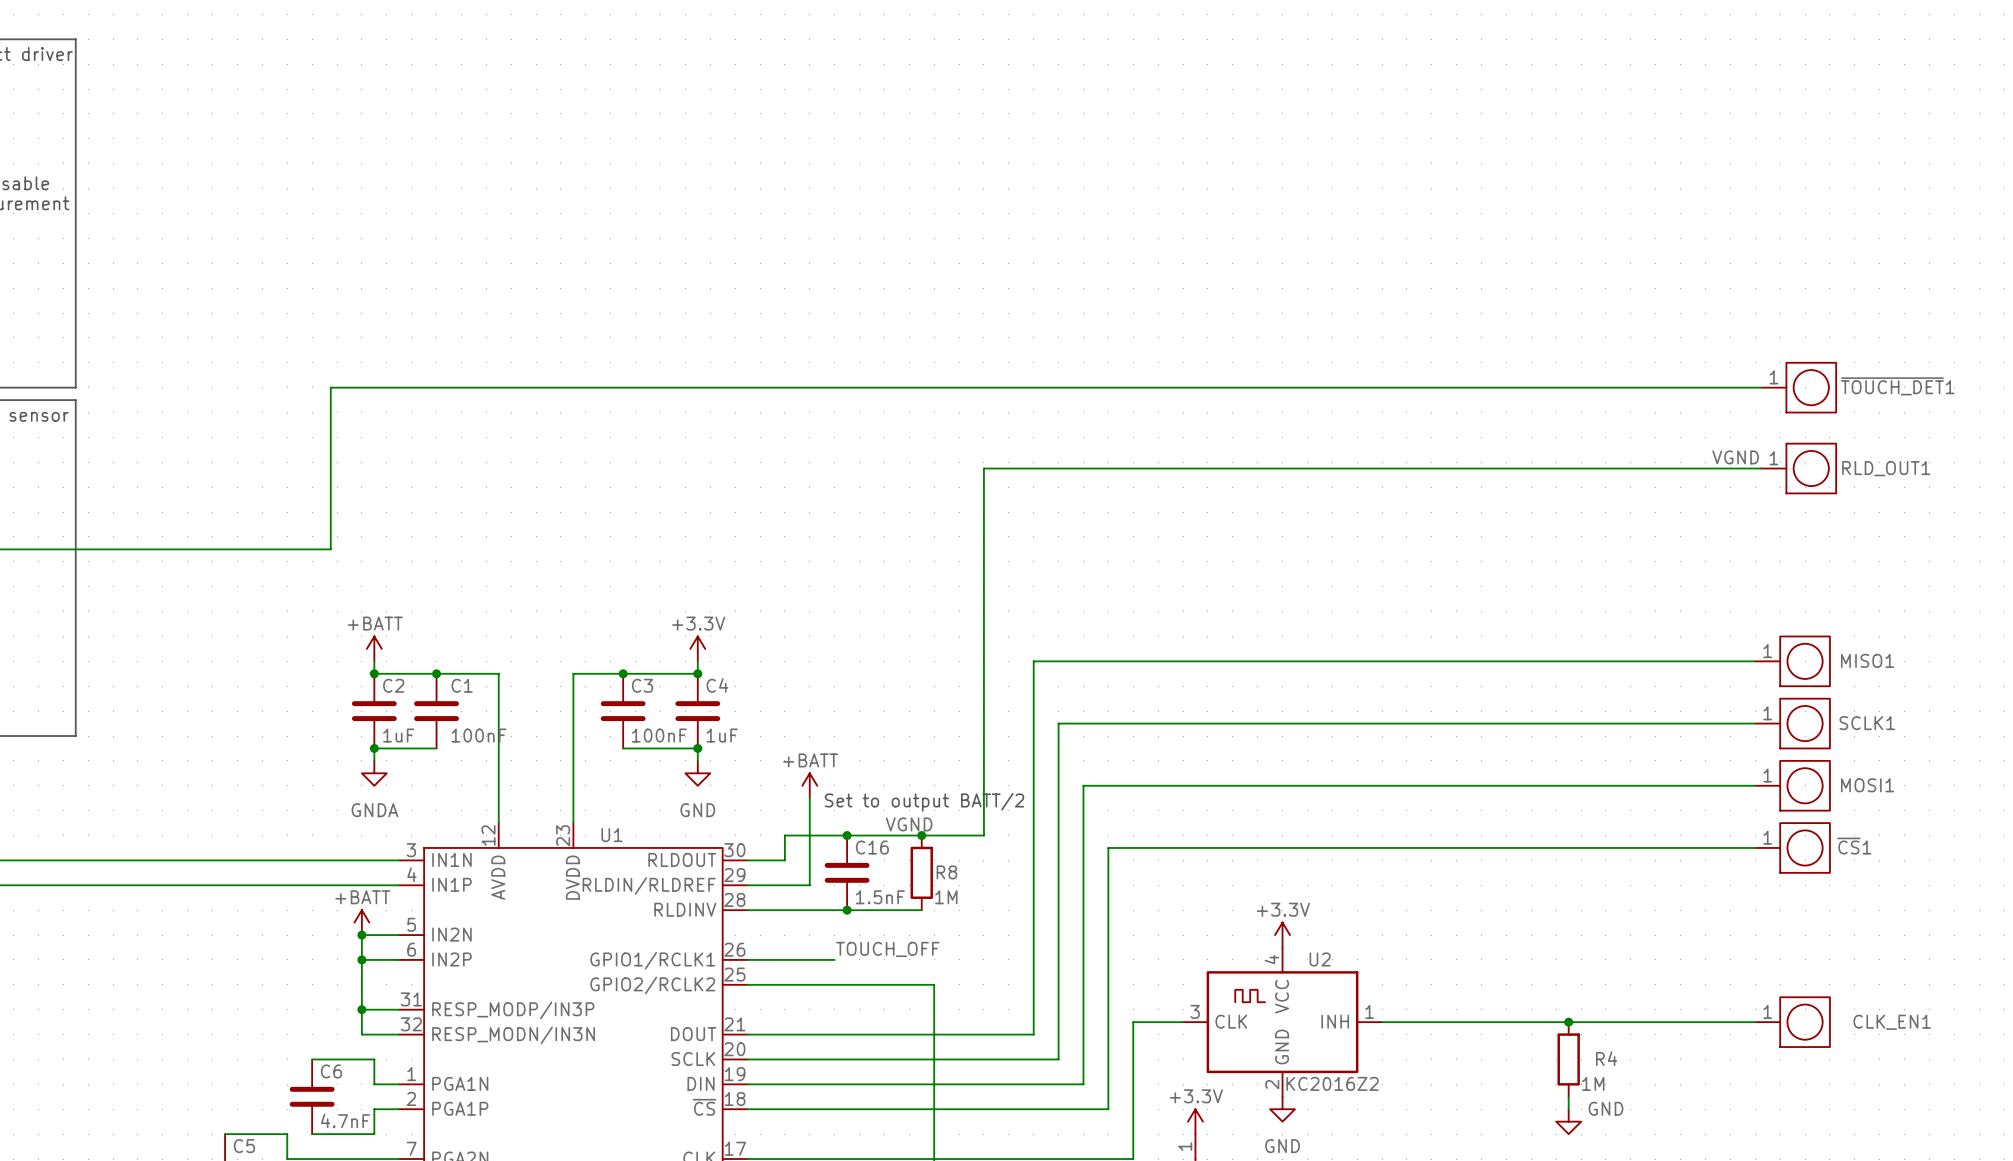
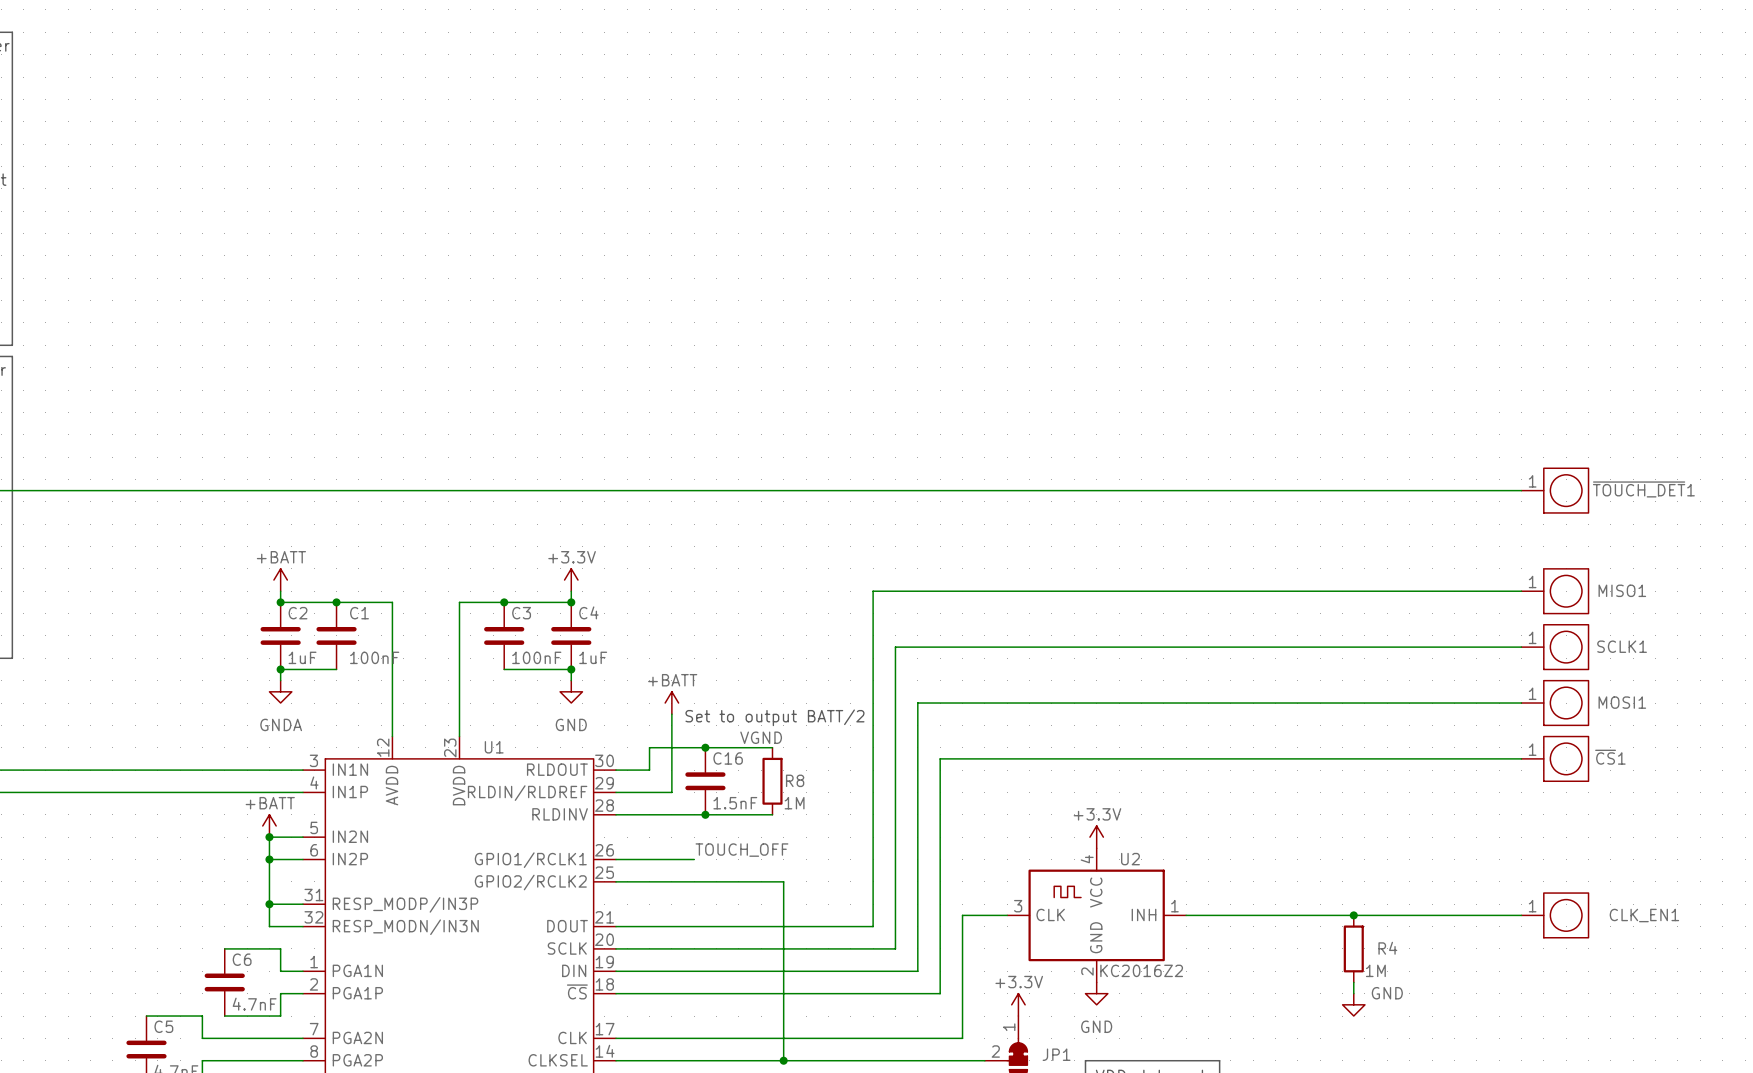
wire: (1761, 387) (330, 387) (330, 549) -> (1521, 490) (241, 490)
~{TOUCH_DET}1 position: (1798, 387) -> (1554, 490)
label: VGND (1735, 457) -> none
wire: (1761, 468) (983, 468) (983, 835) (921, 835) -> none
RLD_OUT1: (1798, 468) -> none
junction: (921, 835) -> none

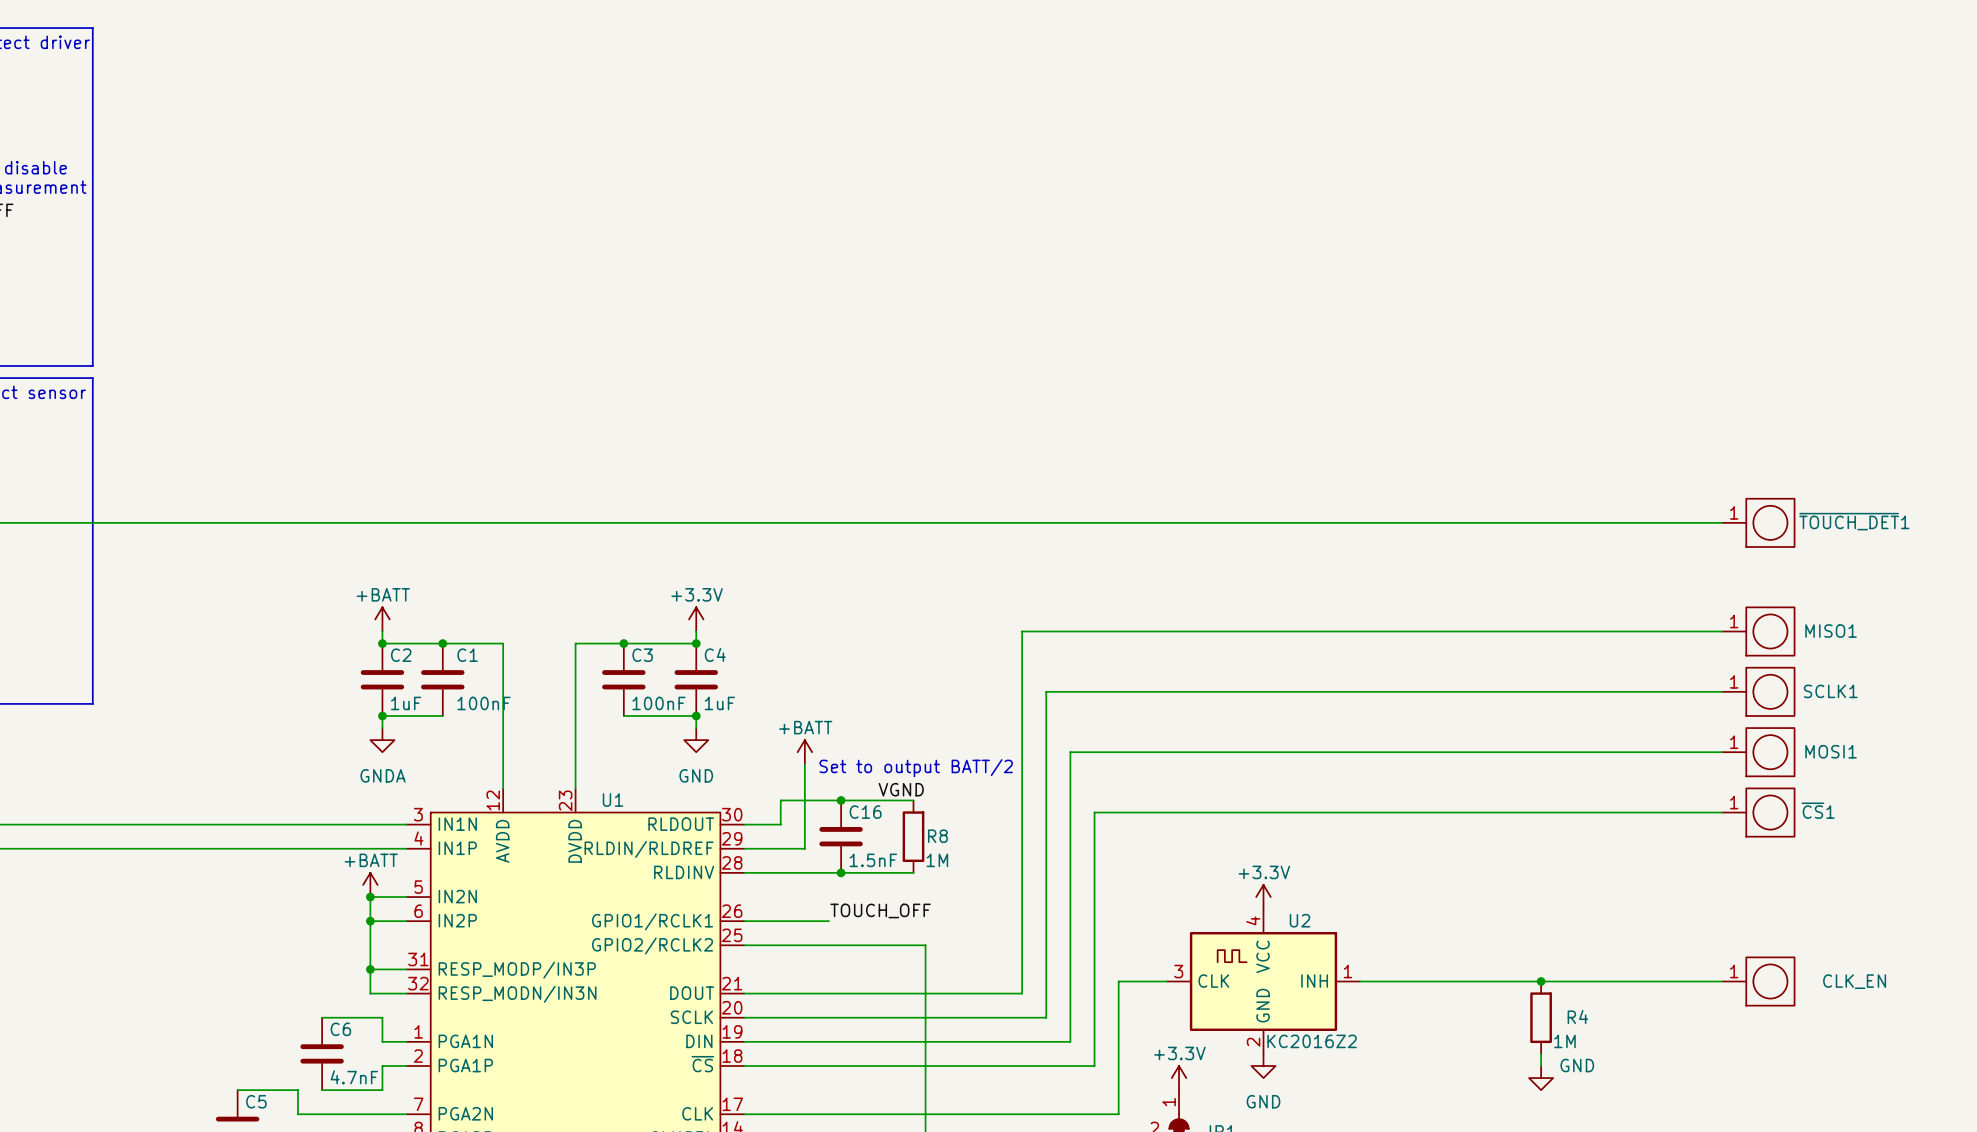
CLK_EN1 name: CLK_EN1 (1644, 915) -> CLK_EN (1854, 981)

